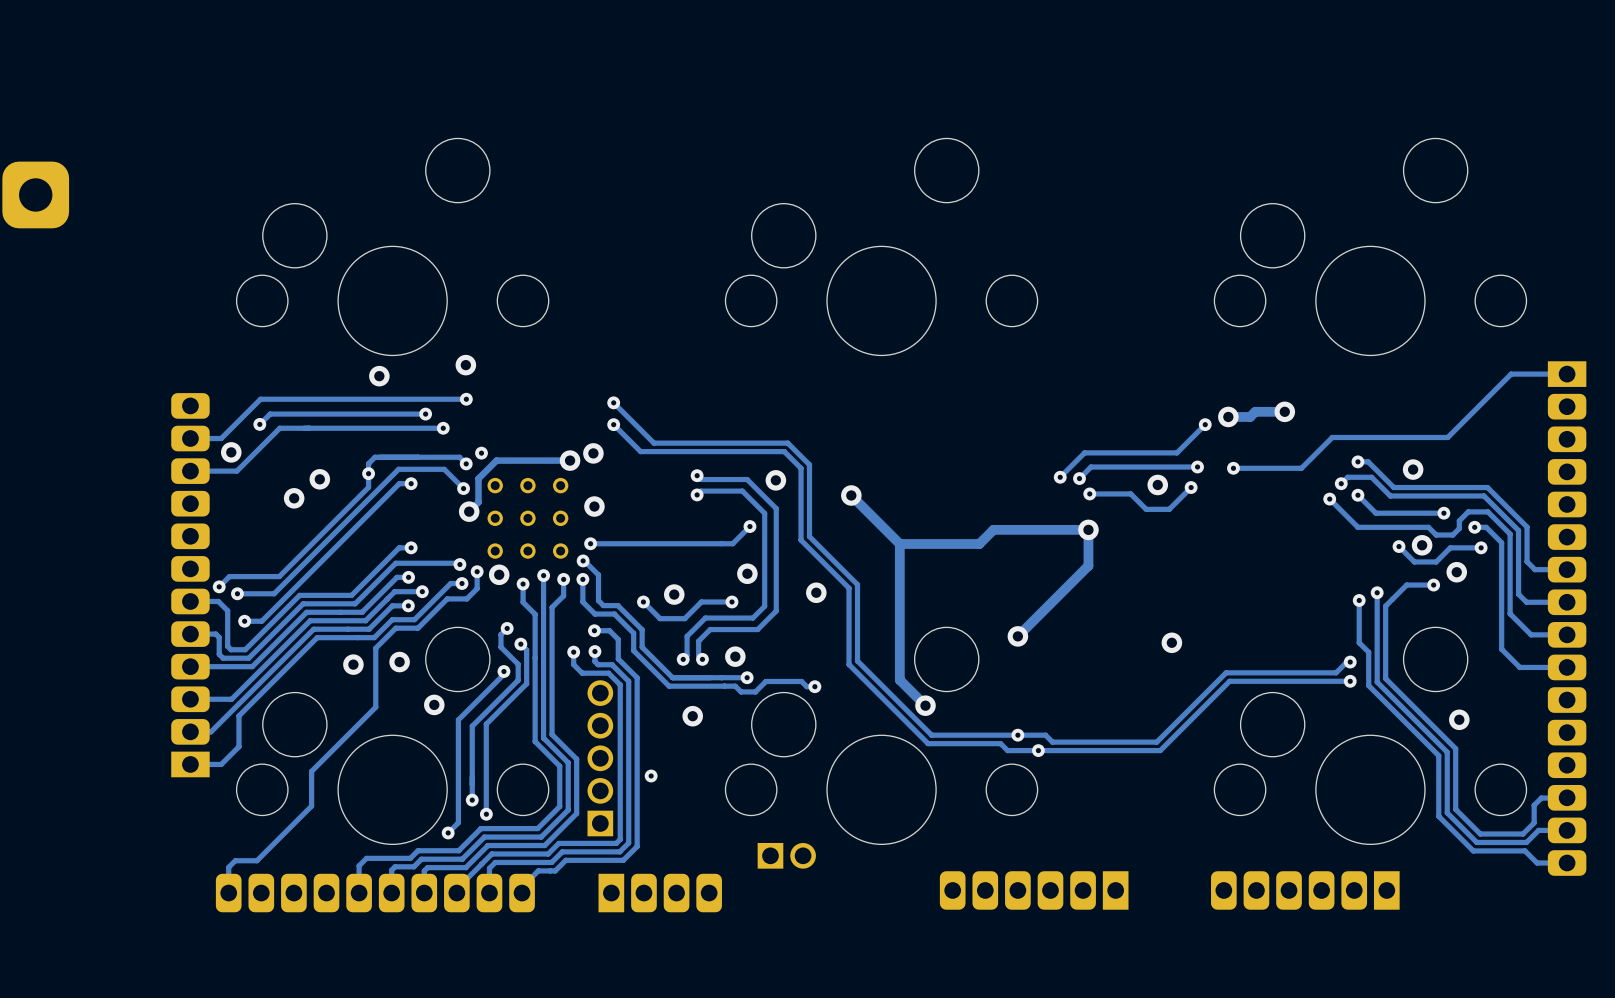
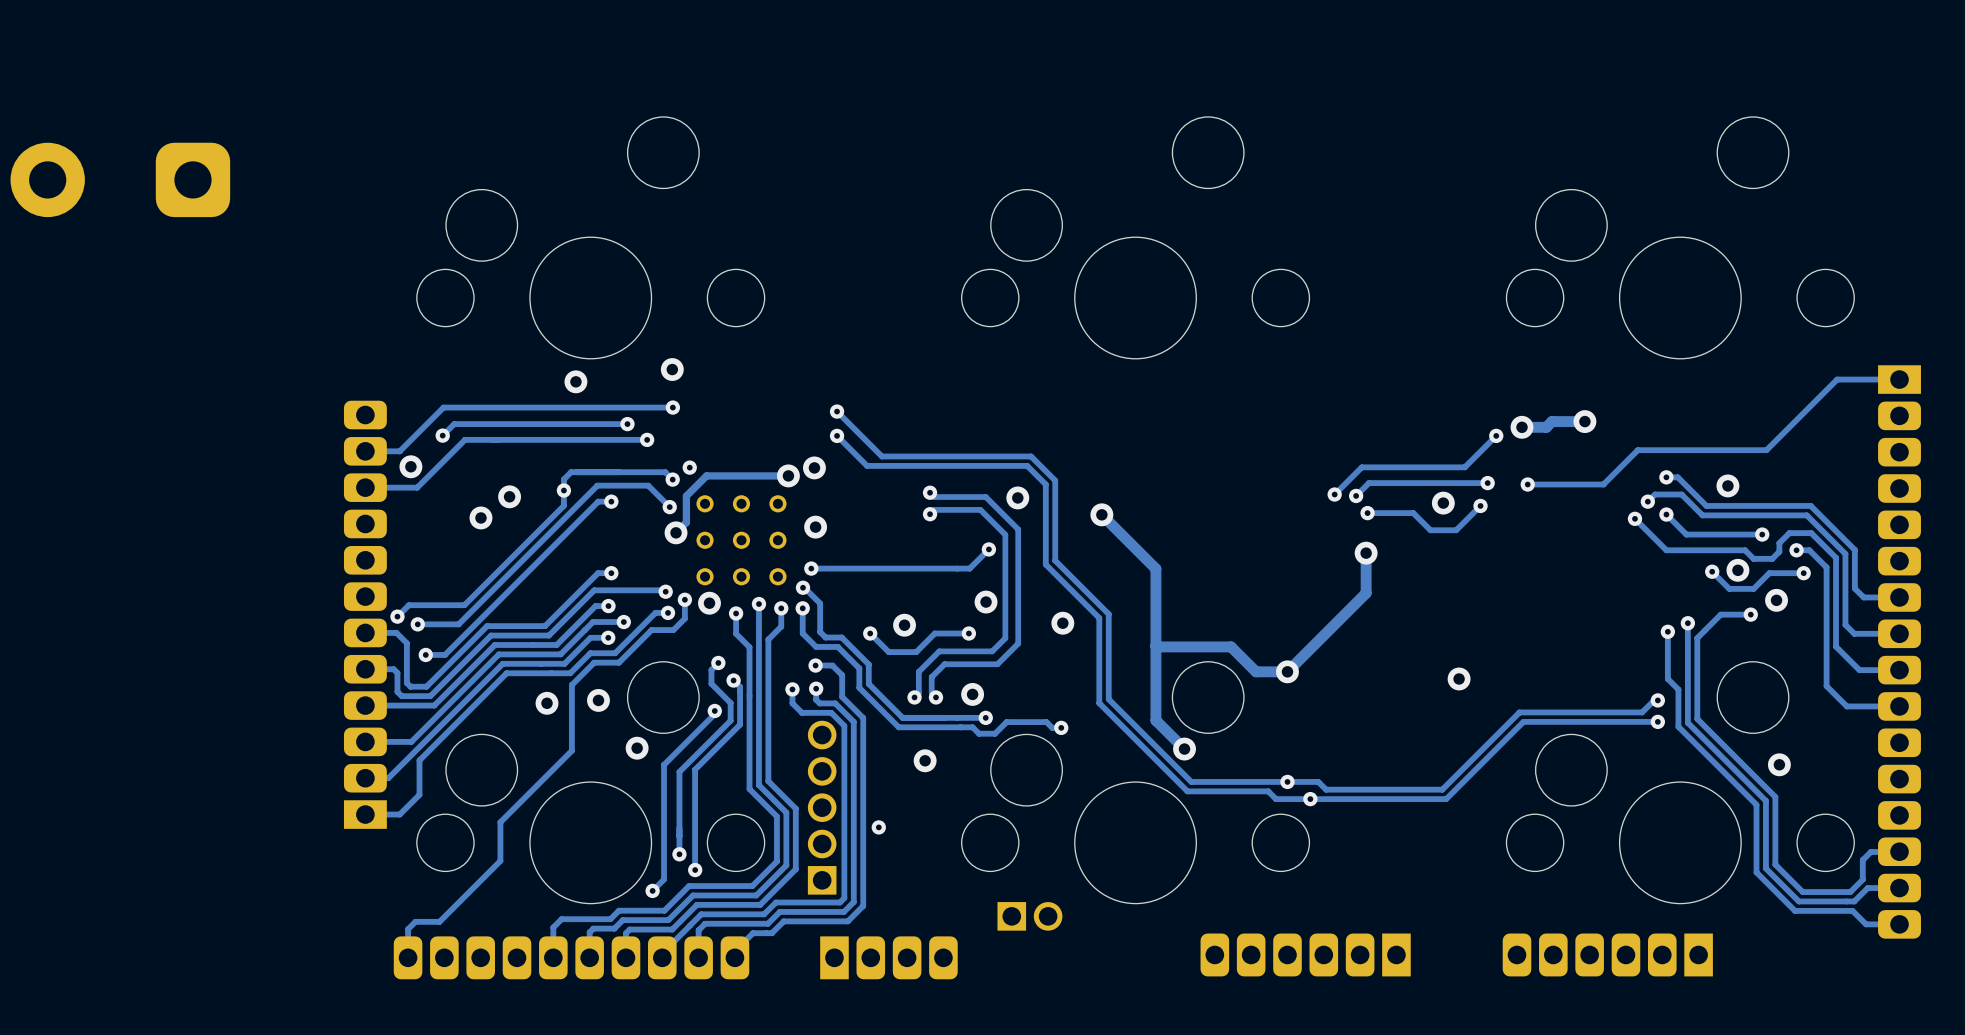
track: (1088, 529) (993, 529) (979, 544) (899, 544) -> none
track: none -> (1155, 646) (1231, 646) (1256, 671) (1287, 671)

